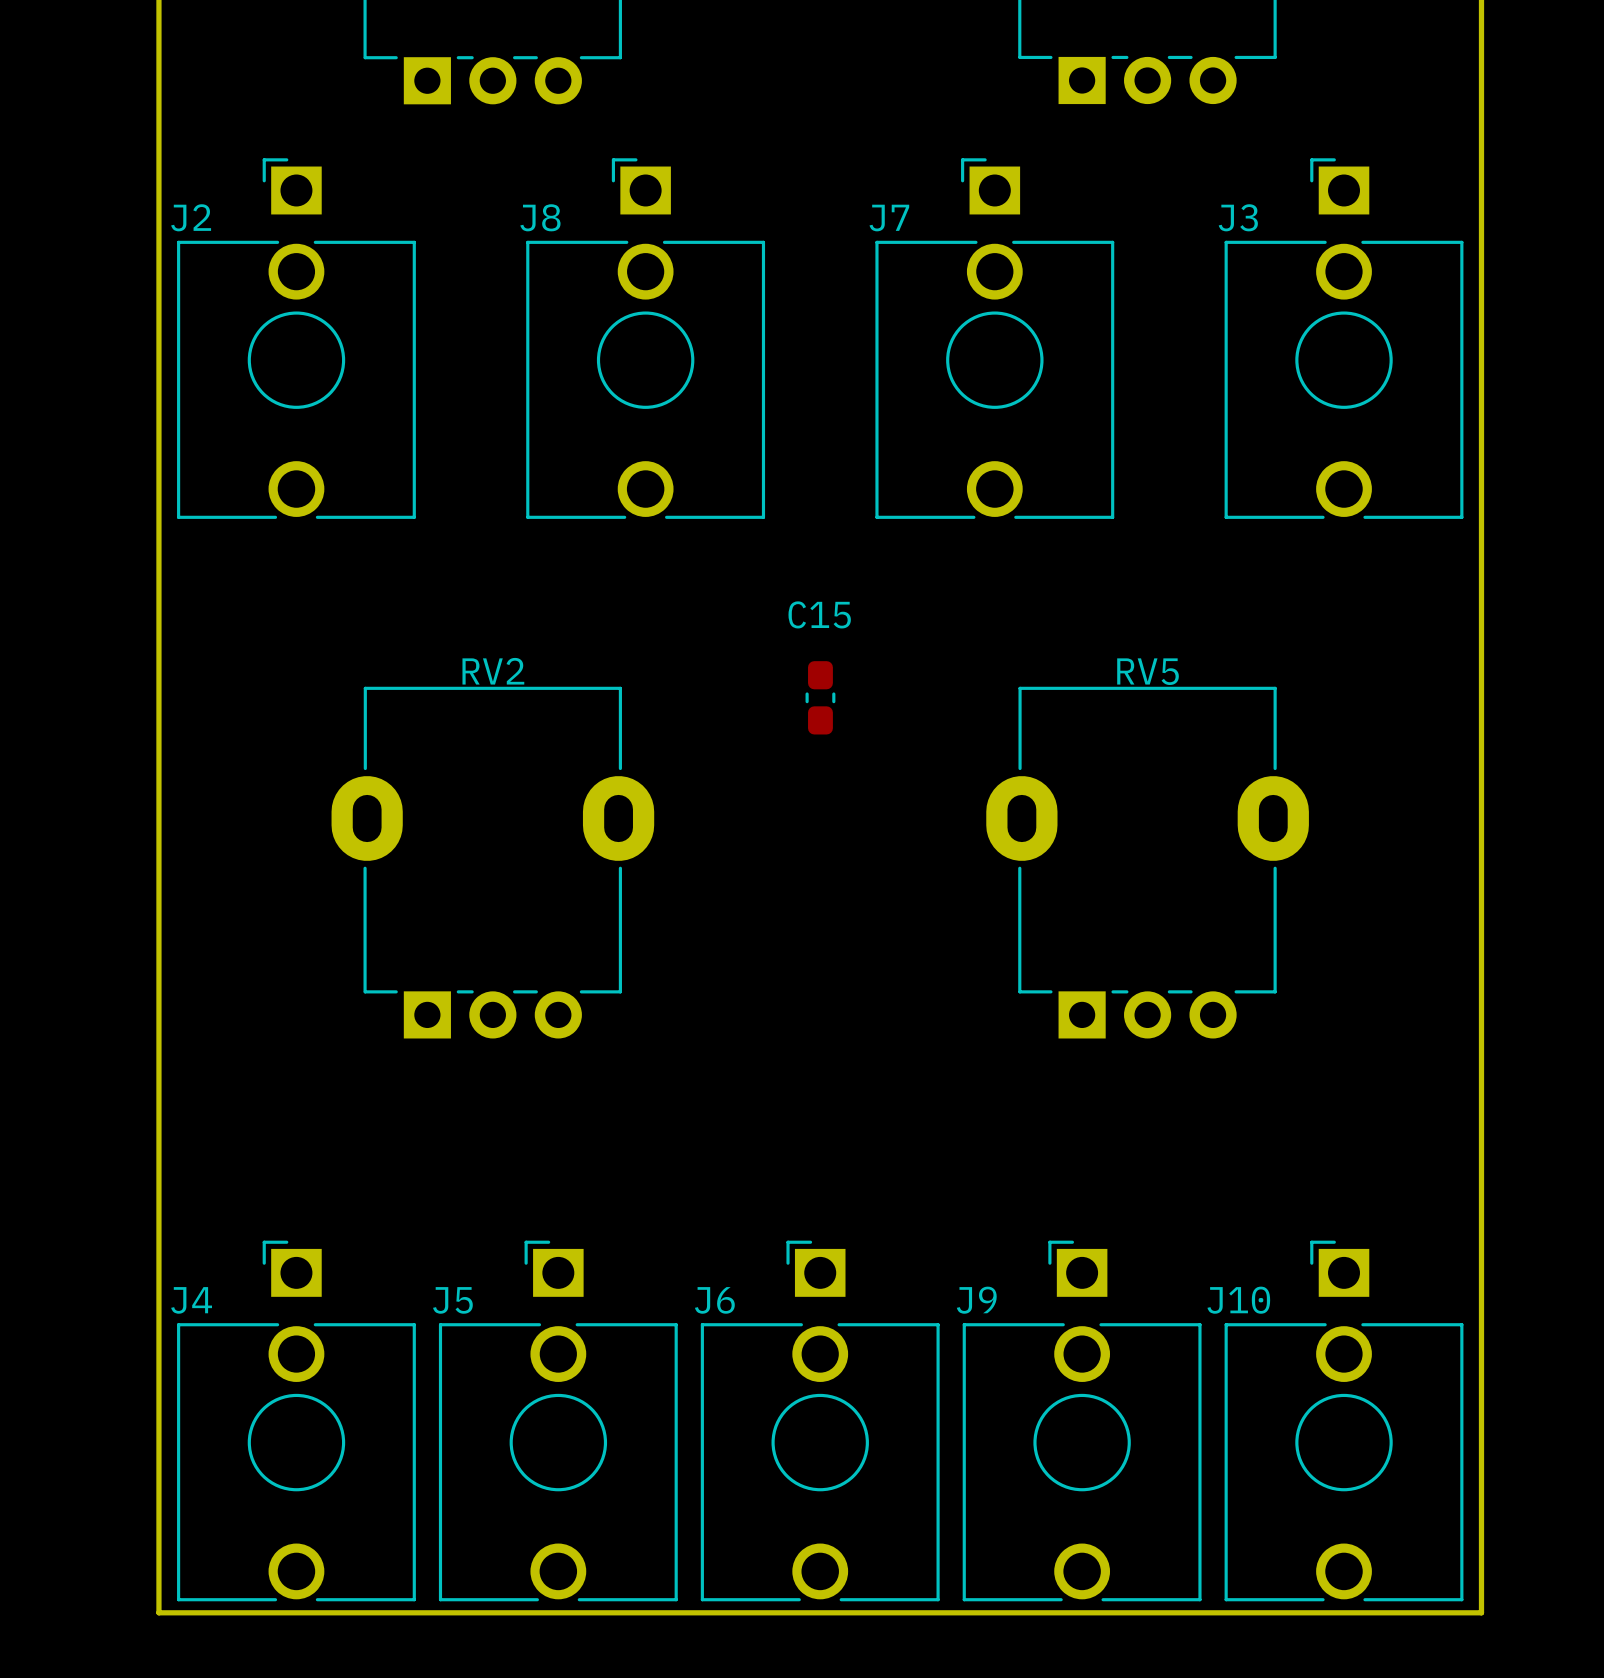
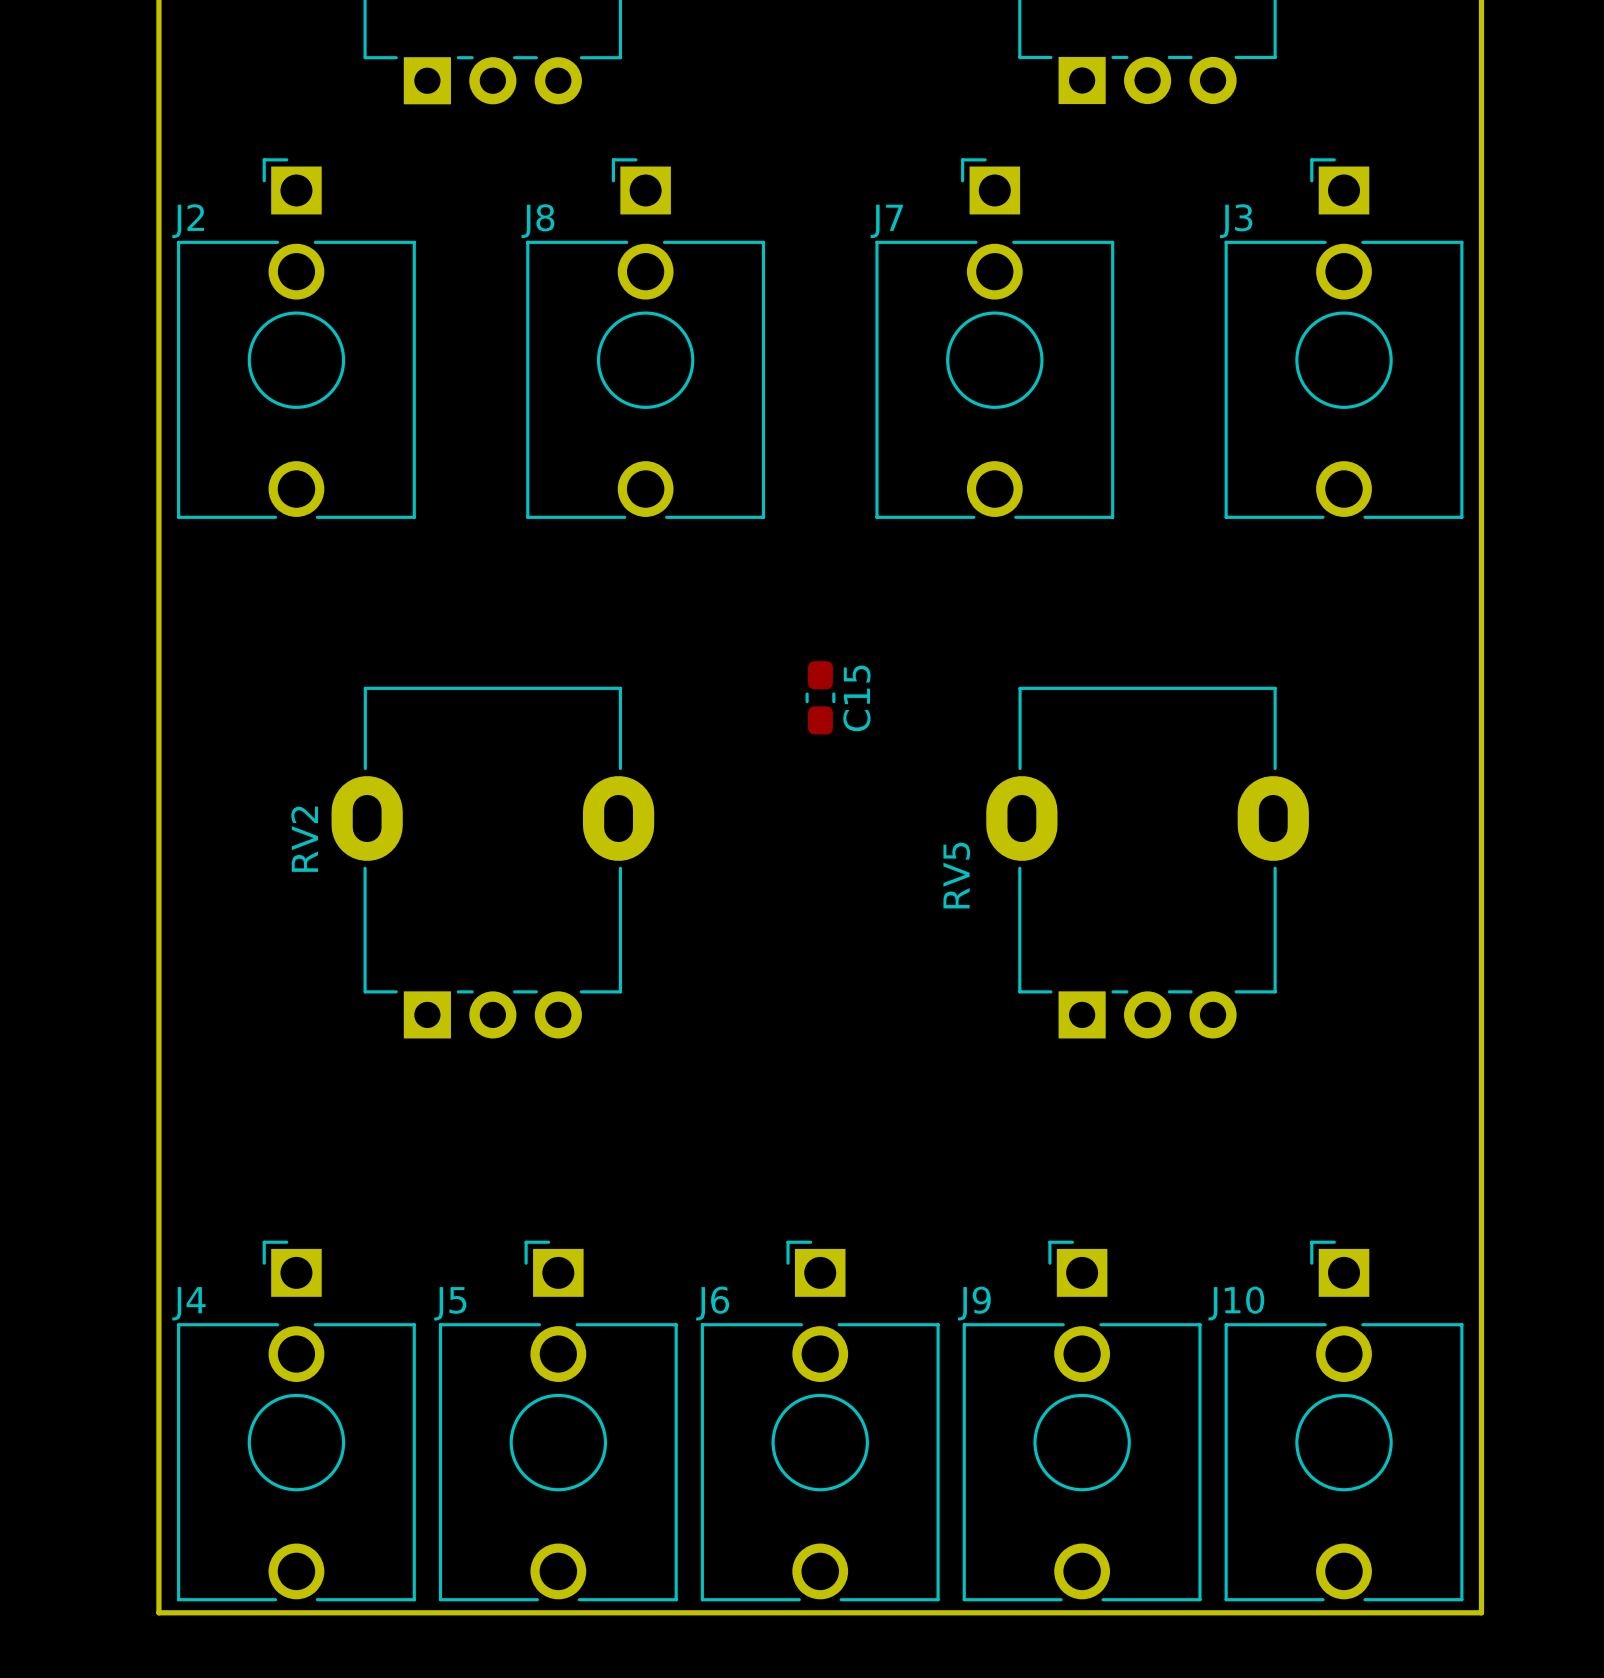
C15 name rotation: 0° (819, 614) -> 90° counterclockwise (856, 698)
RV2 name rotation: 0° (493, 671) -> 90° counterclockwise (304, 839)
RV2 name position: RV2 (493, 671) -> RV2 (304, 839)
RV5 name rotation: 0° (1148, 671) -> 90° counterclockwise (956, 875)
RV5 name position: RV5 (1148, 671) -> RV5 (956, 875)

